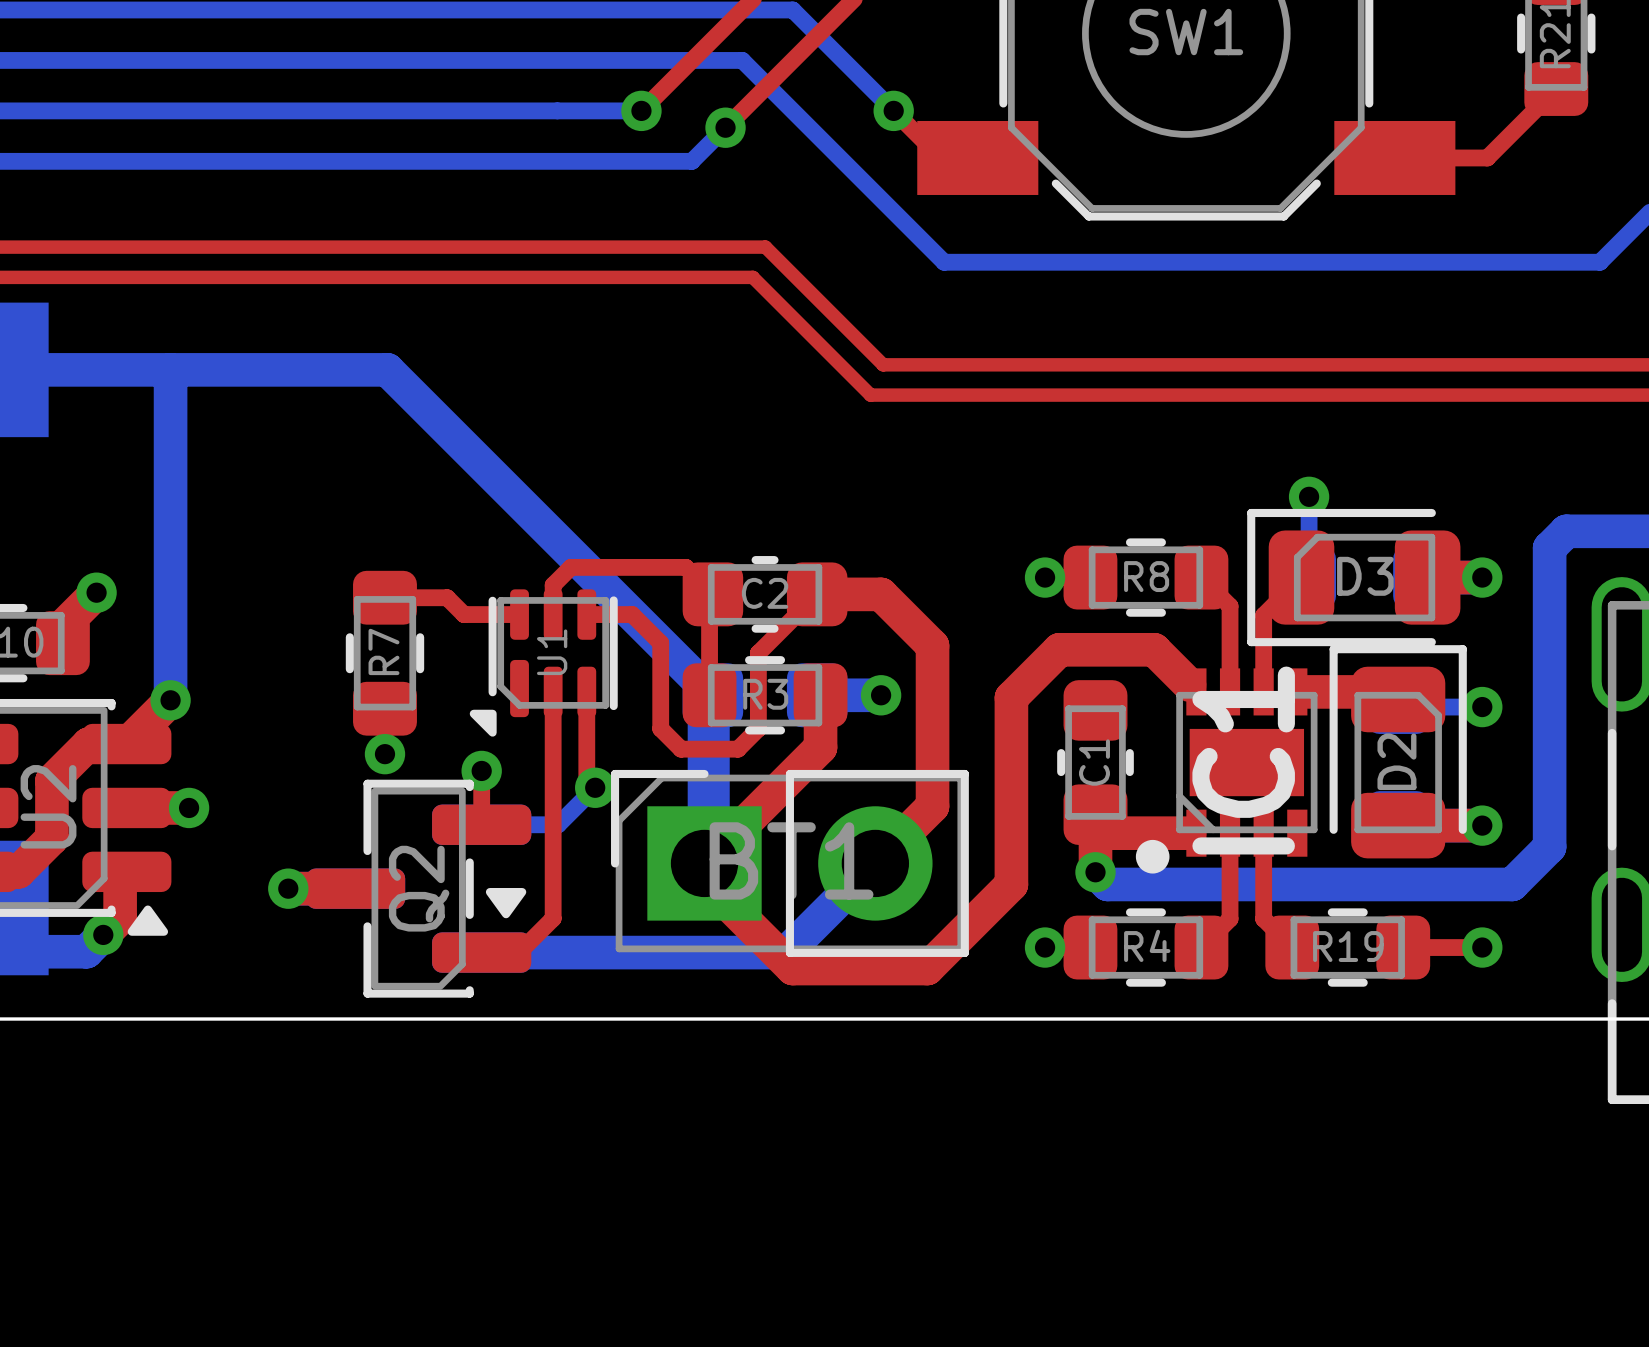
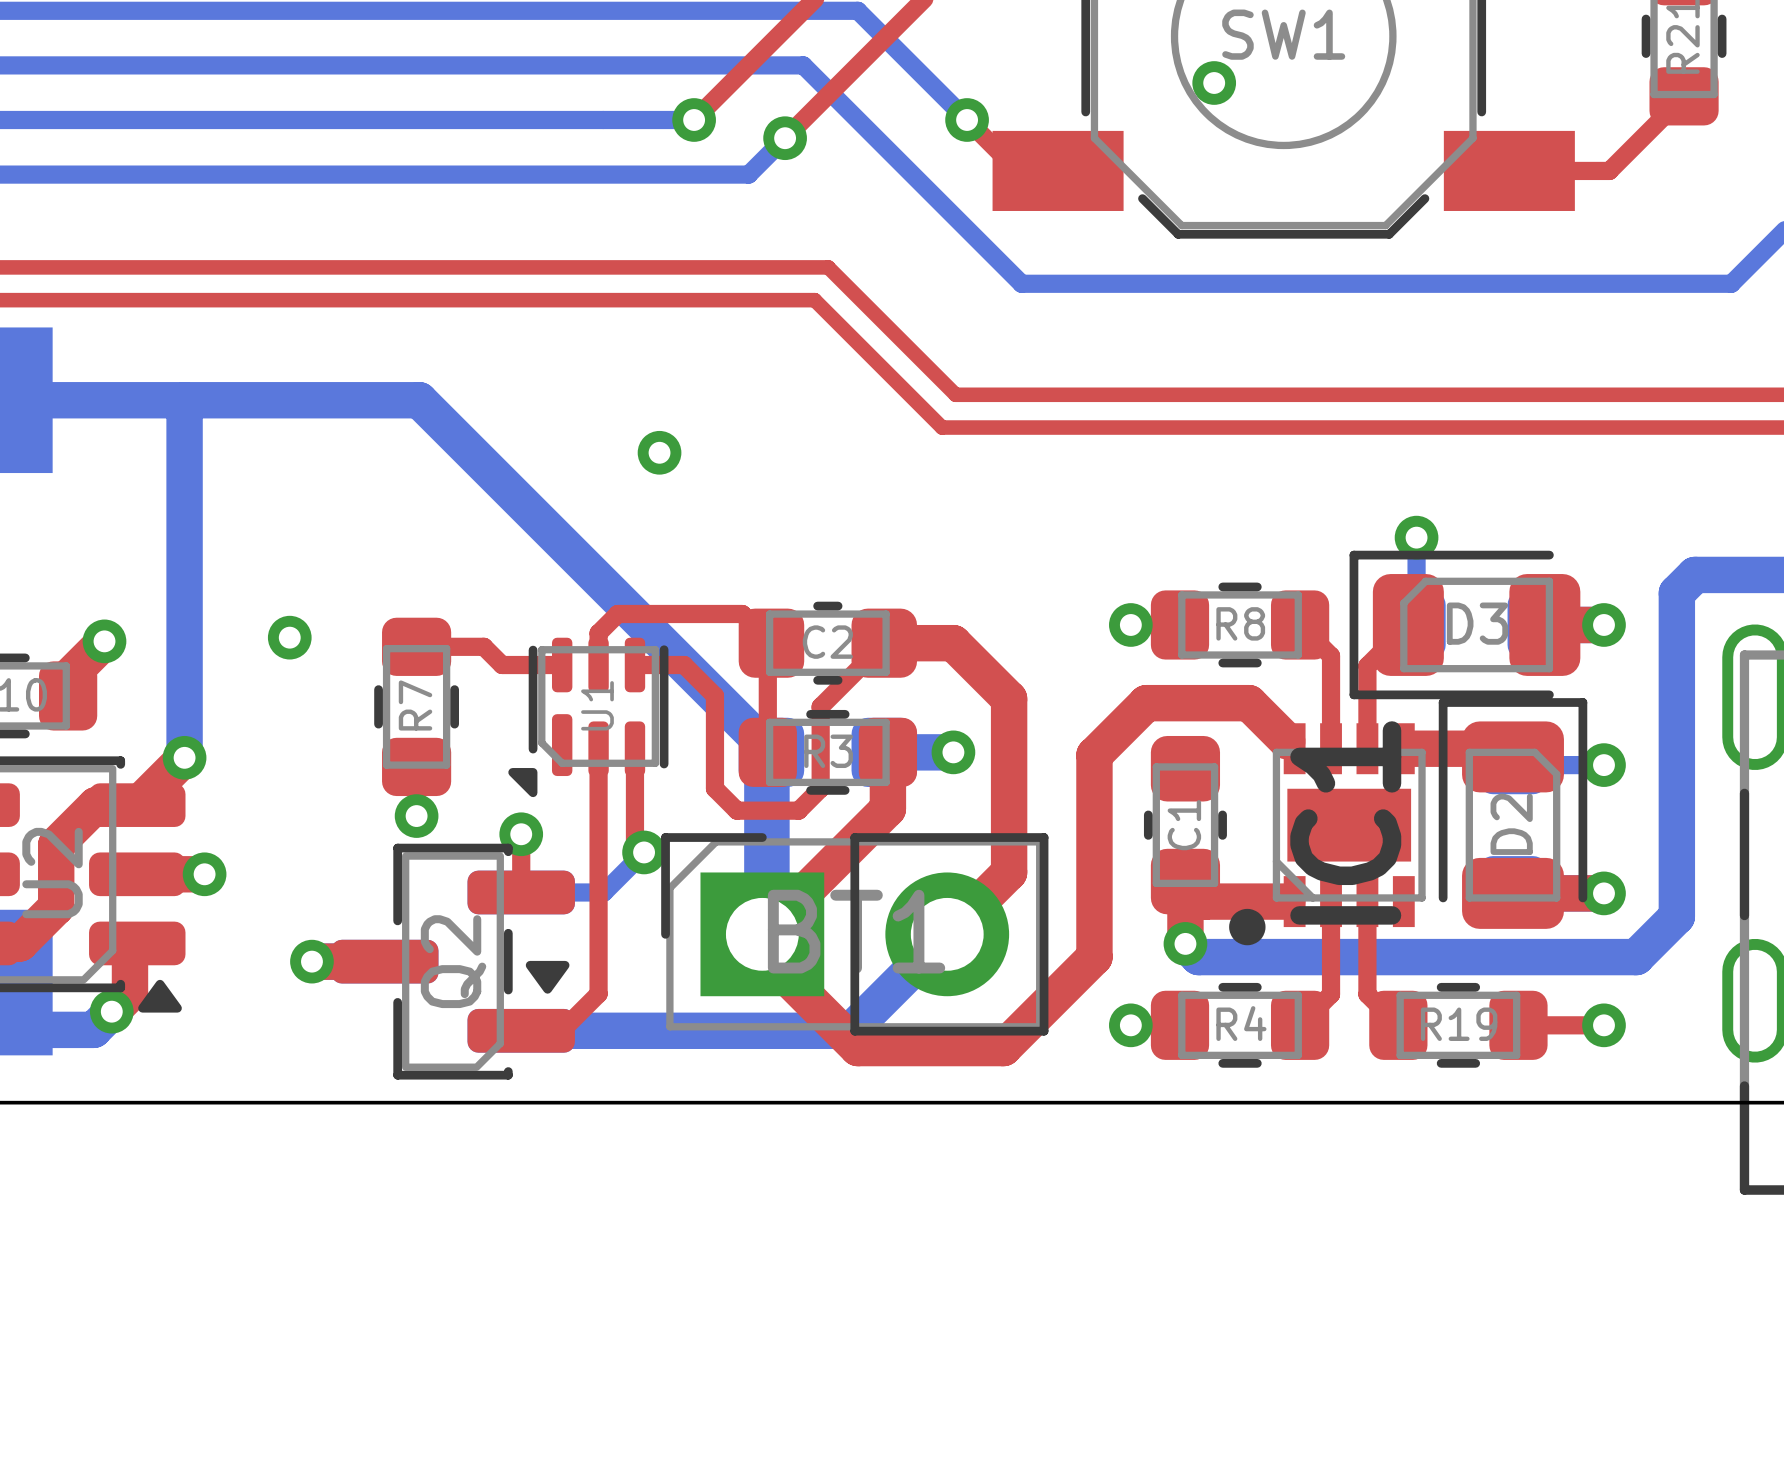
via: none -> (1214, 83)
via: none -> (659, 452)
via: none -> (289, 637)

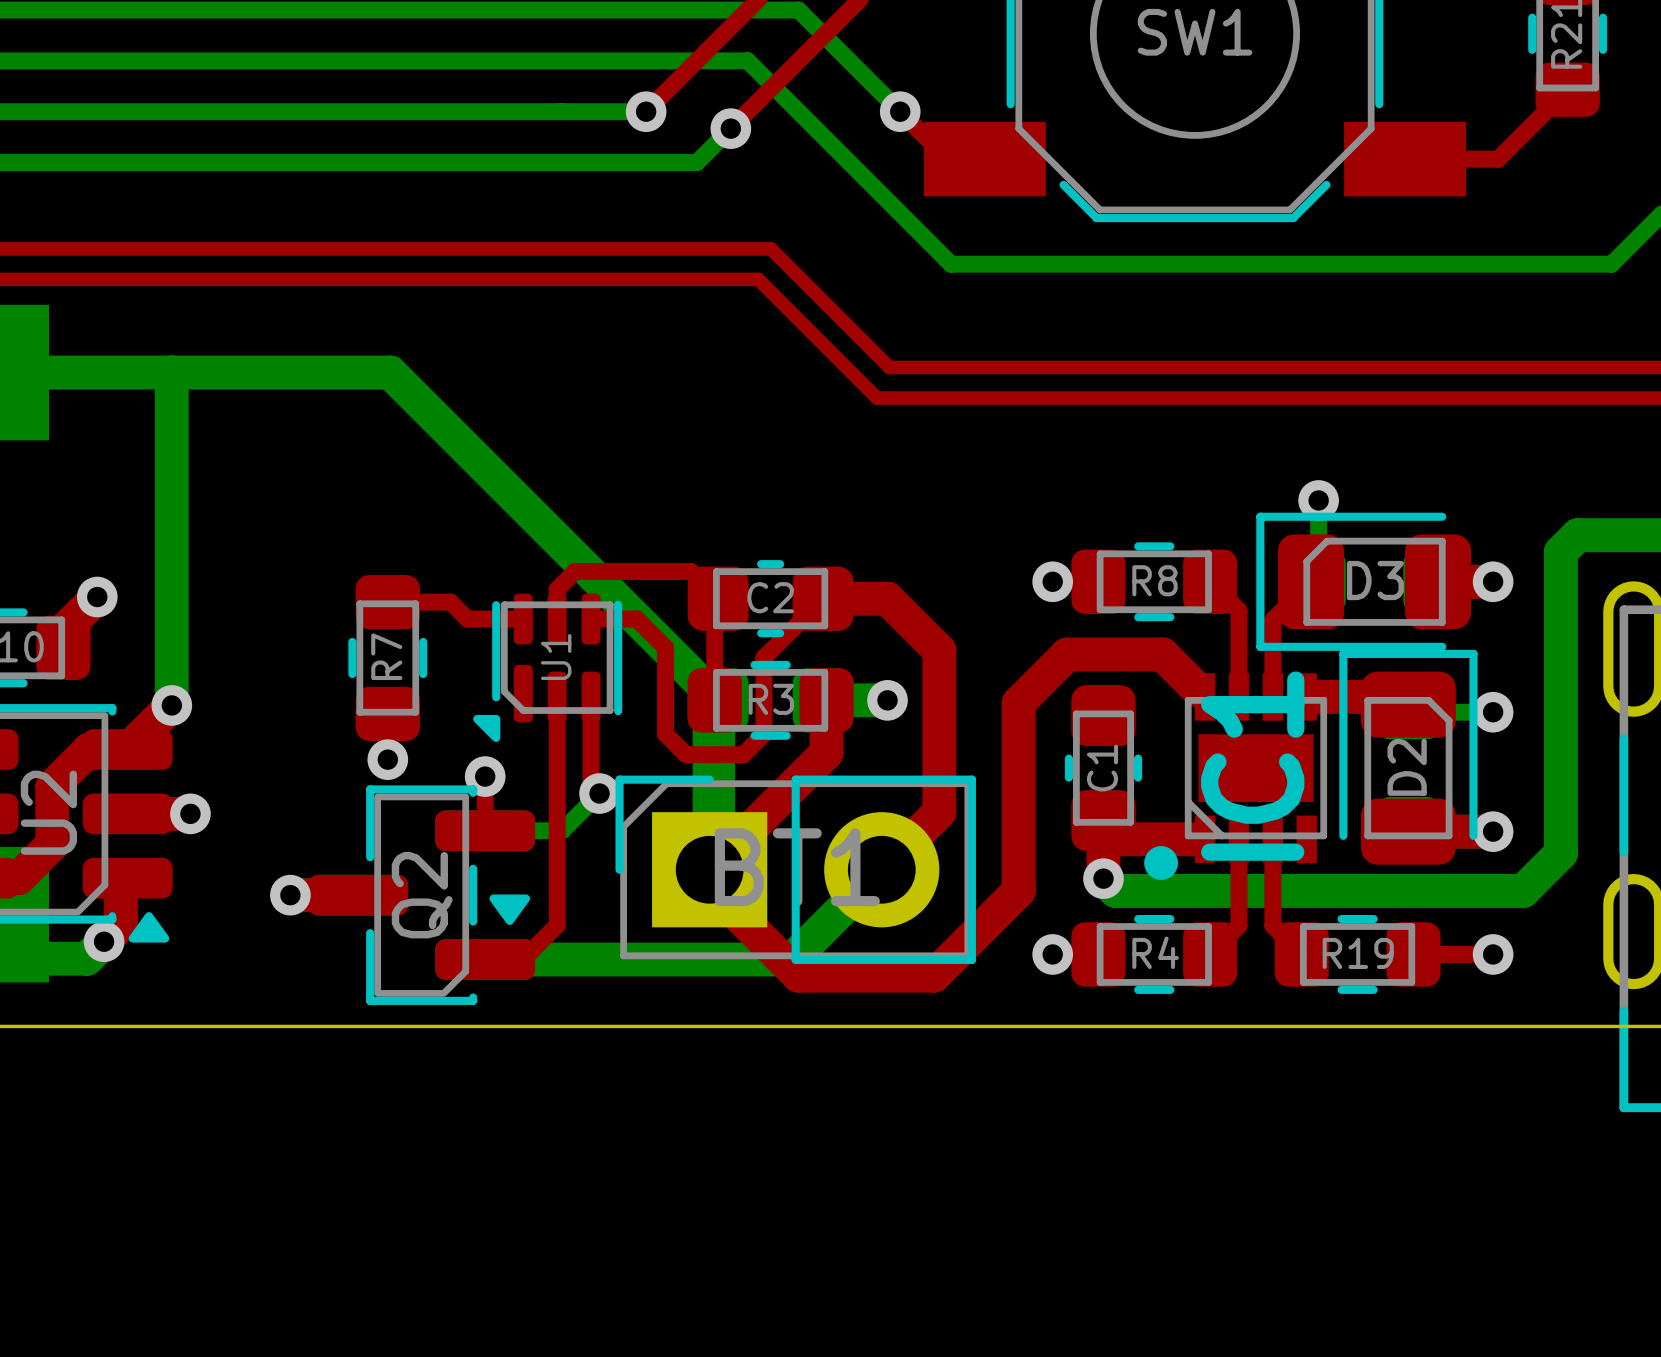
via: (1214, 83) -> none
via: (659, 452) -> none
via: (289, 637) -> none

